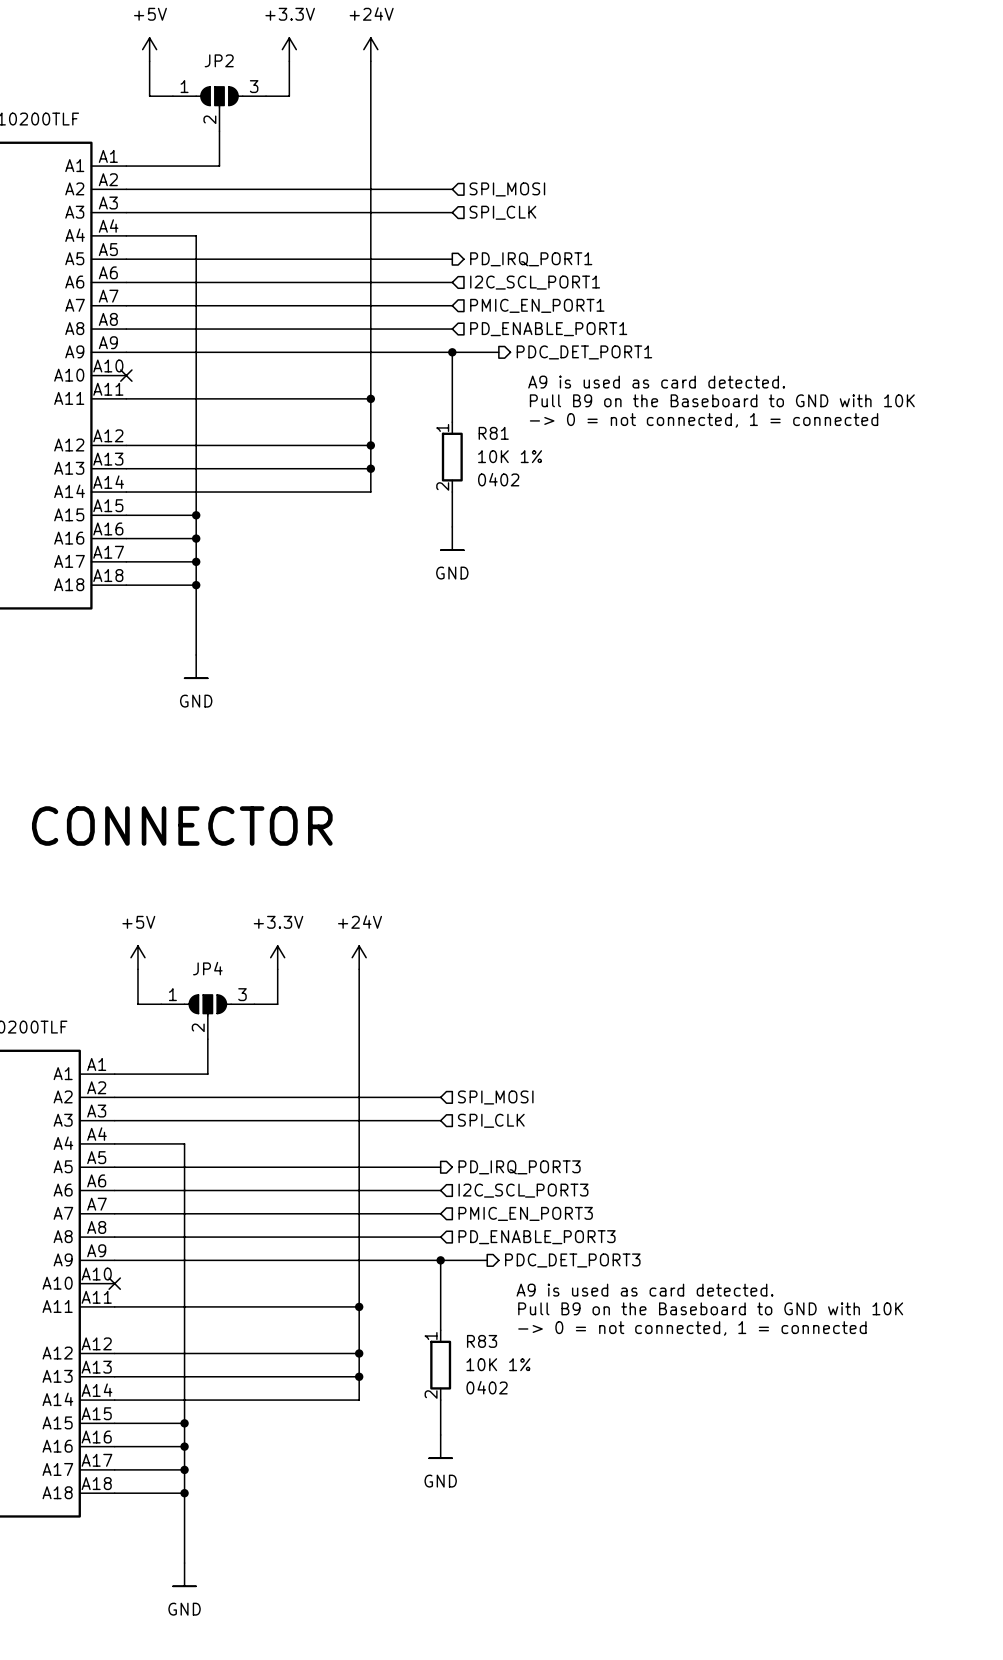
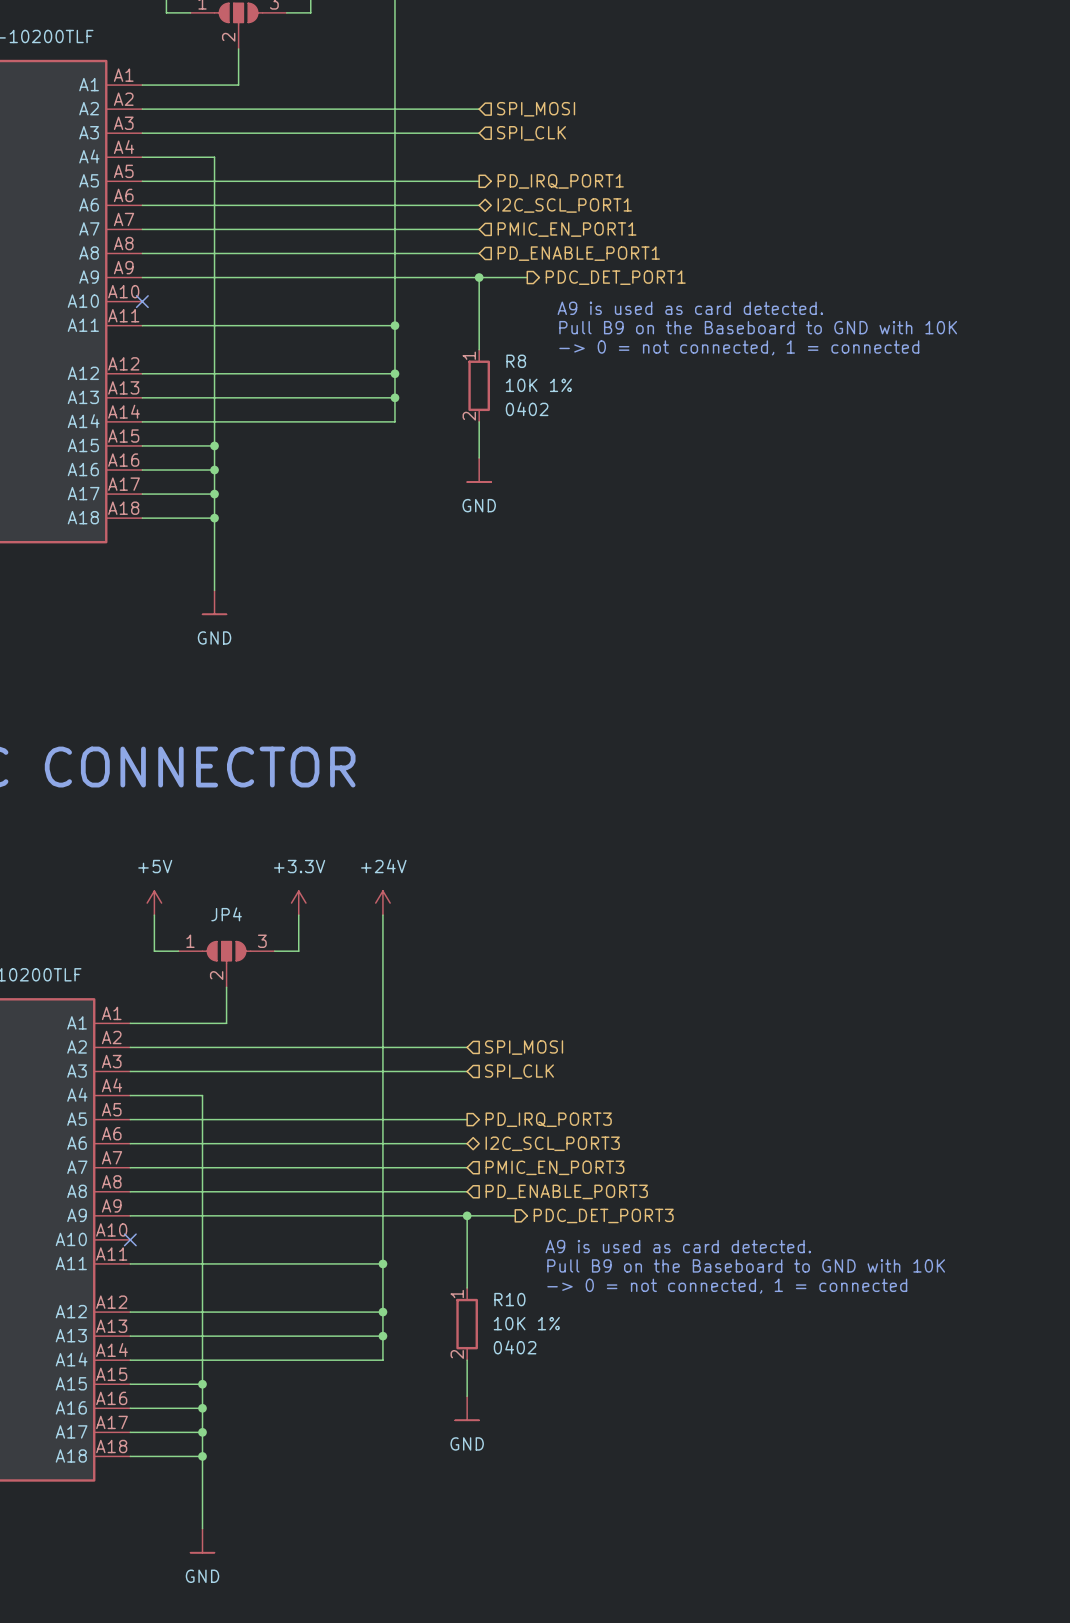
hierarchical label shape: input (535, 282) -> bidirectional (564, 205)
R81 name: R81 (493, 433) -> R8 (516, 361)
hierarchical label shape: input (523, 1190) -> bidirectional (552, 1143)
R83 name: R83 (482, 1341) -> R10 (509, 1299)

